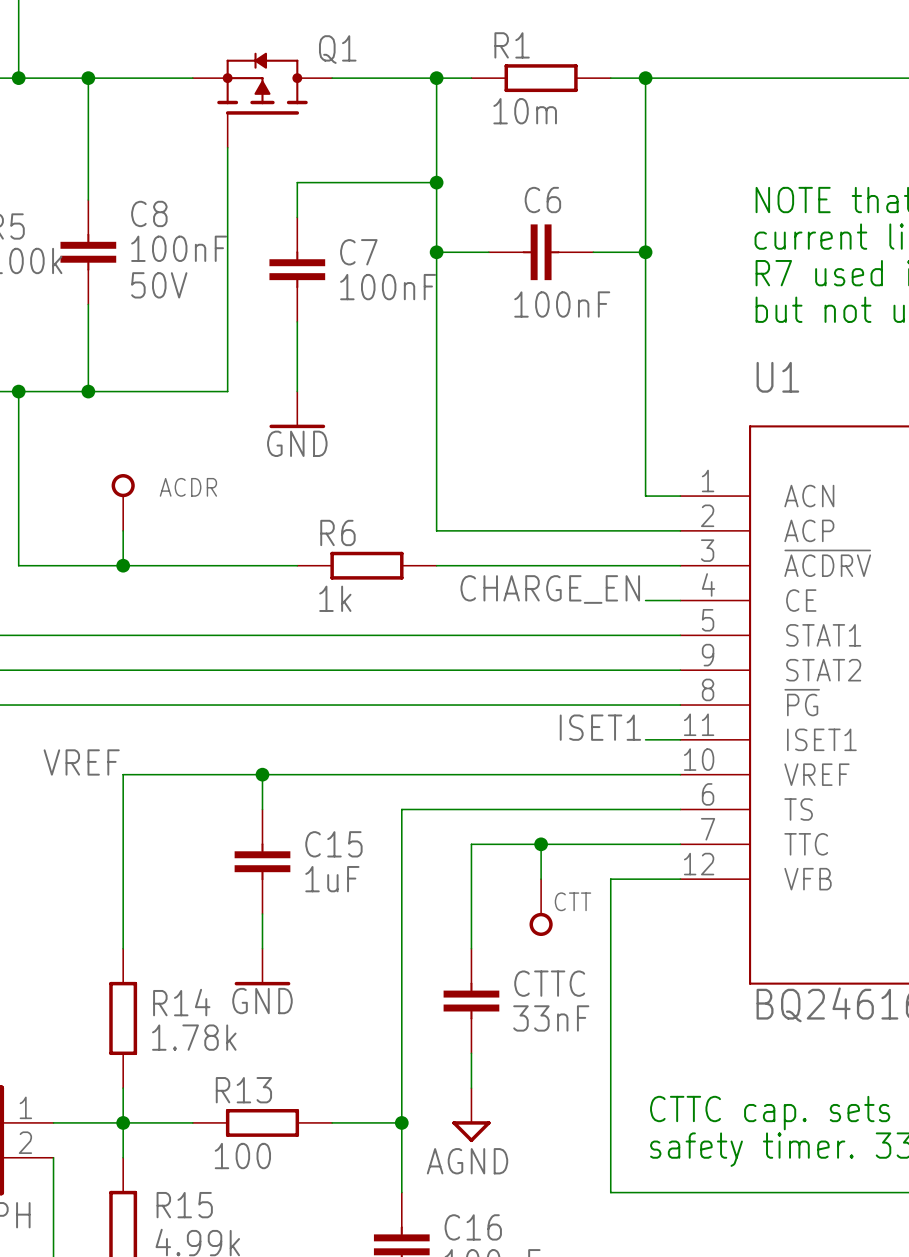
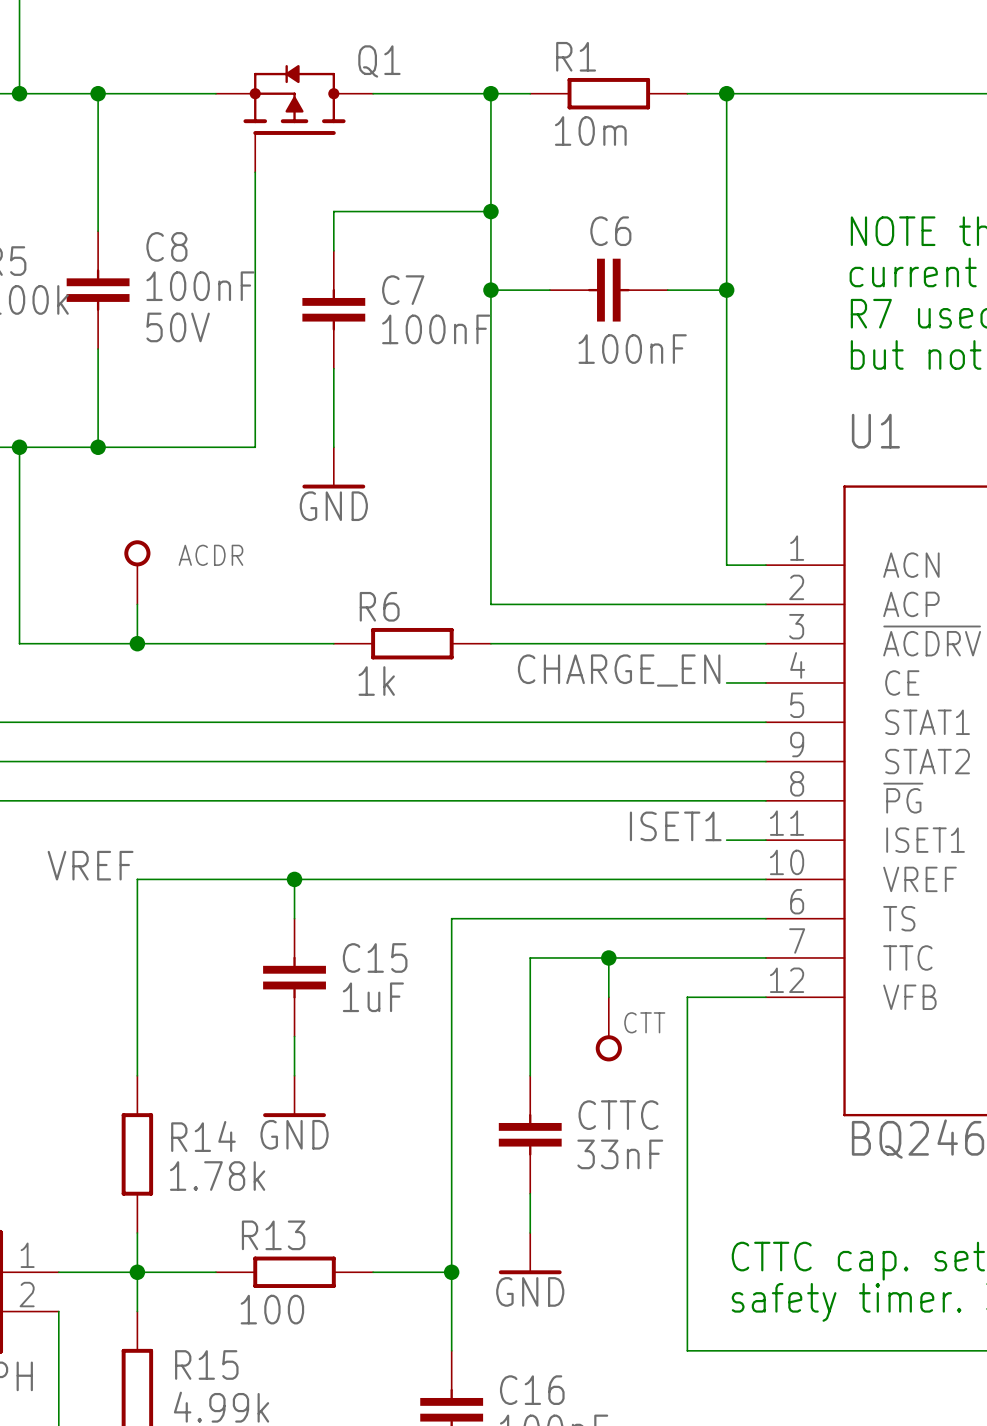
power symbol: AGND (471, 1115) -> GND (530, 1253)

